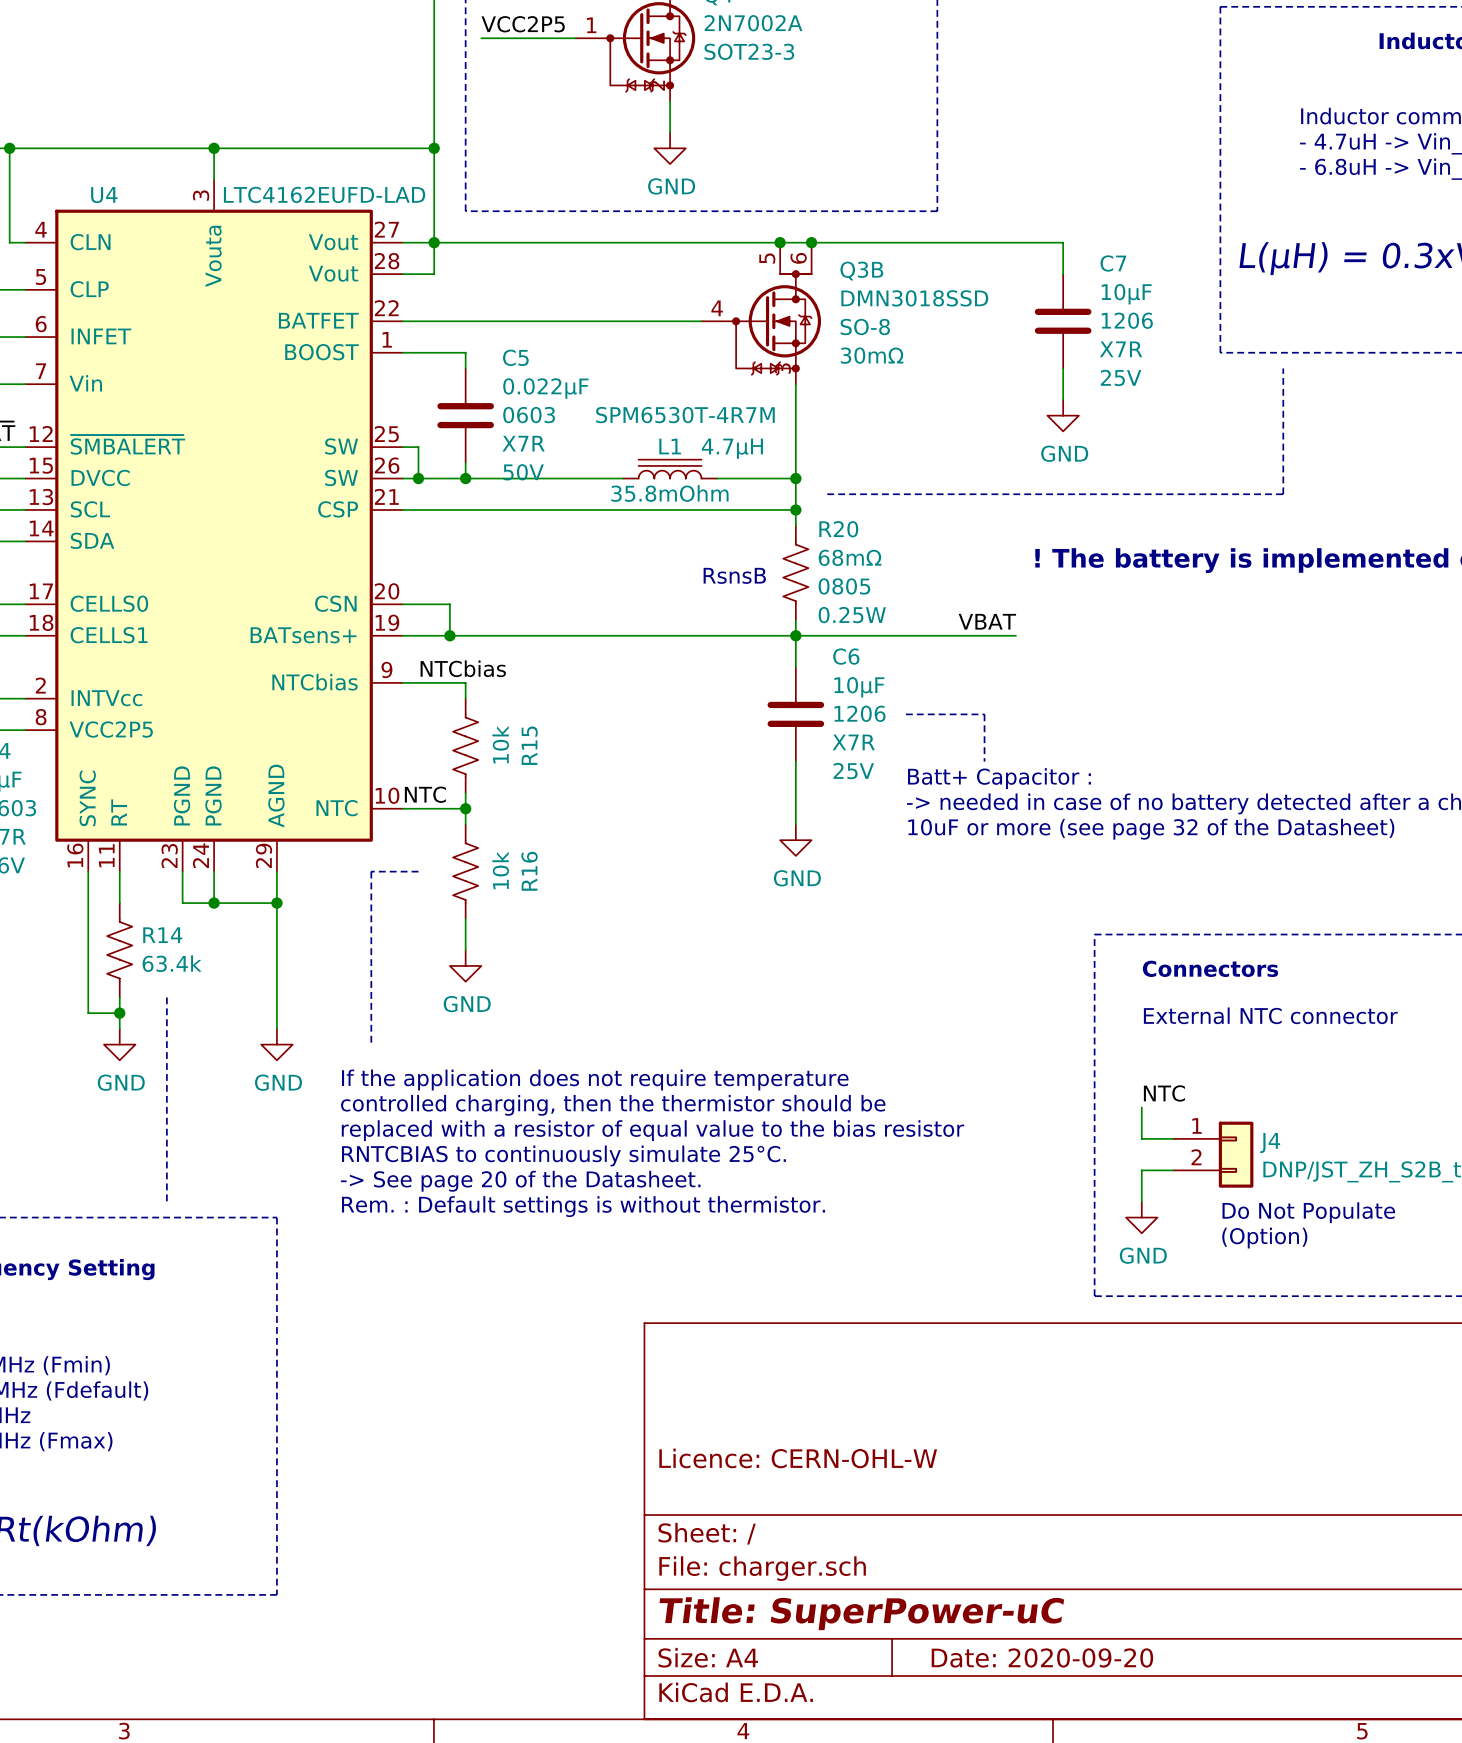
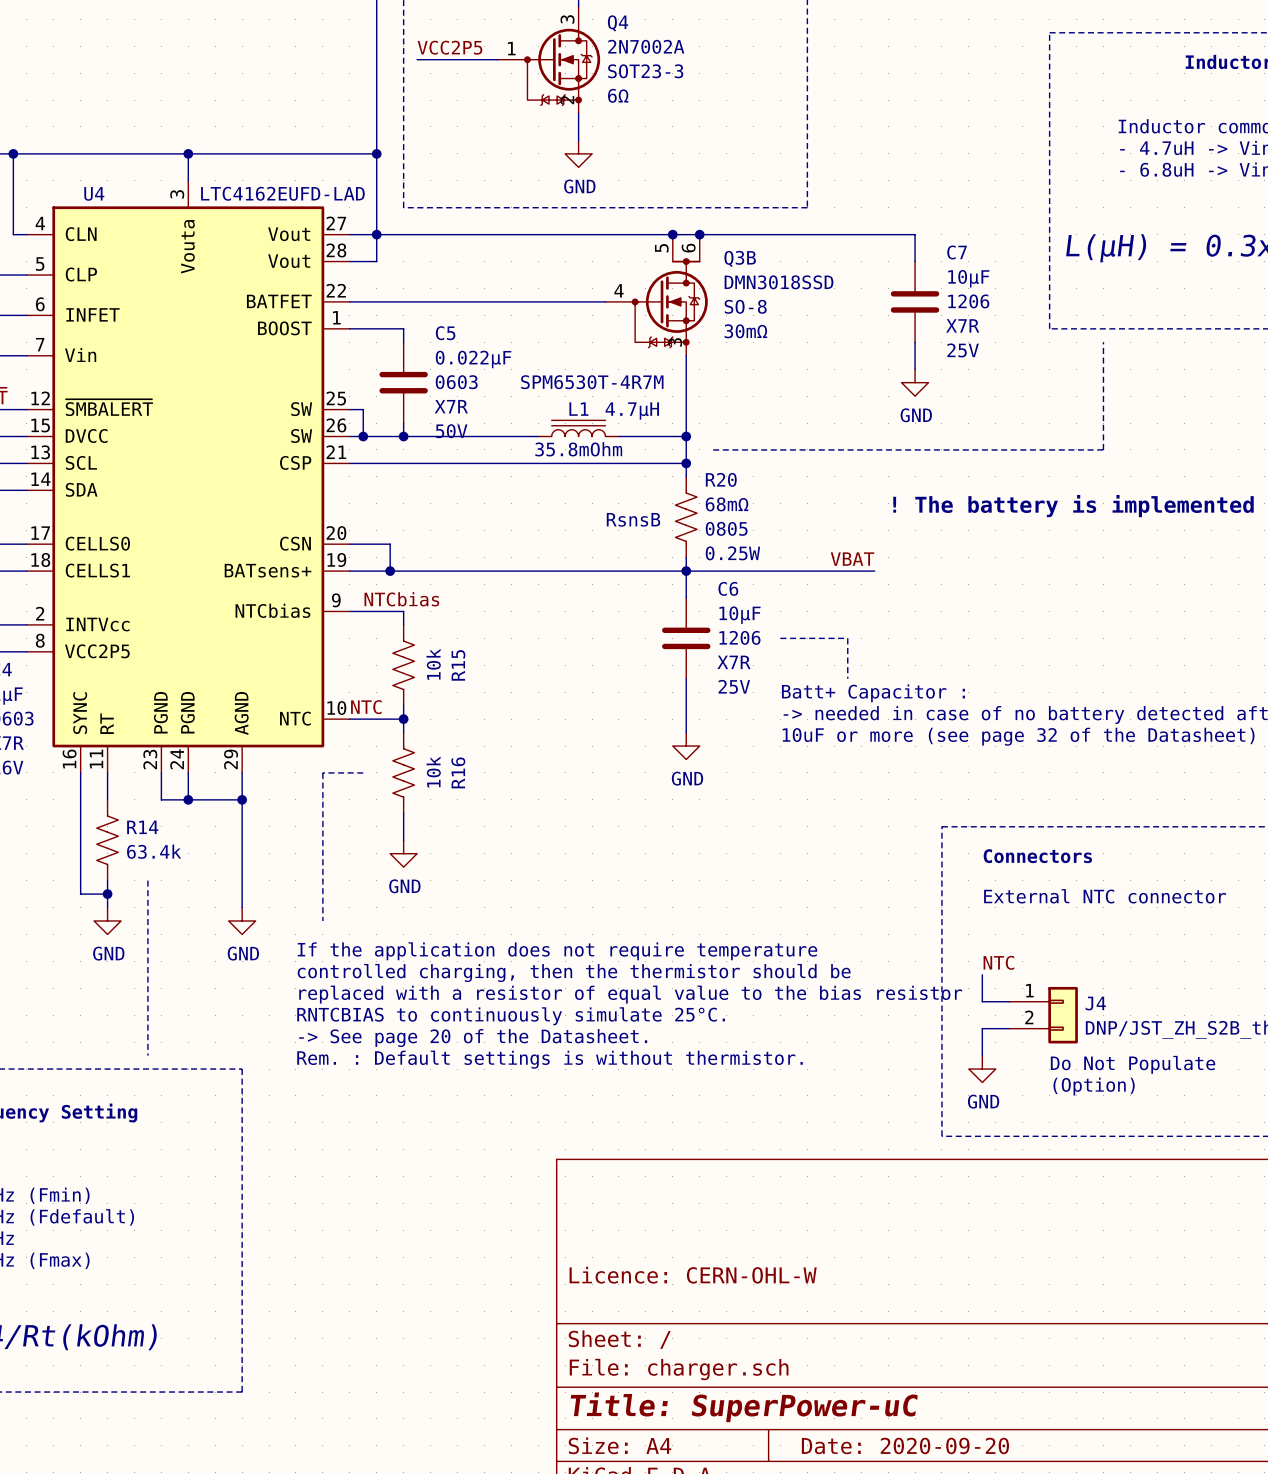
Q4 text: none -> 6Ω (618, 95)

